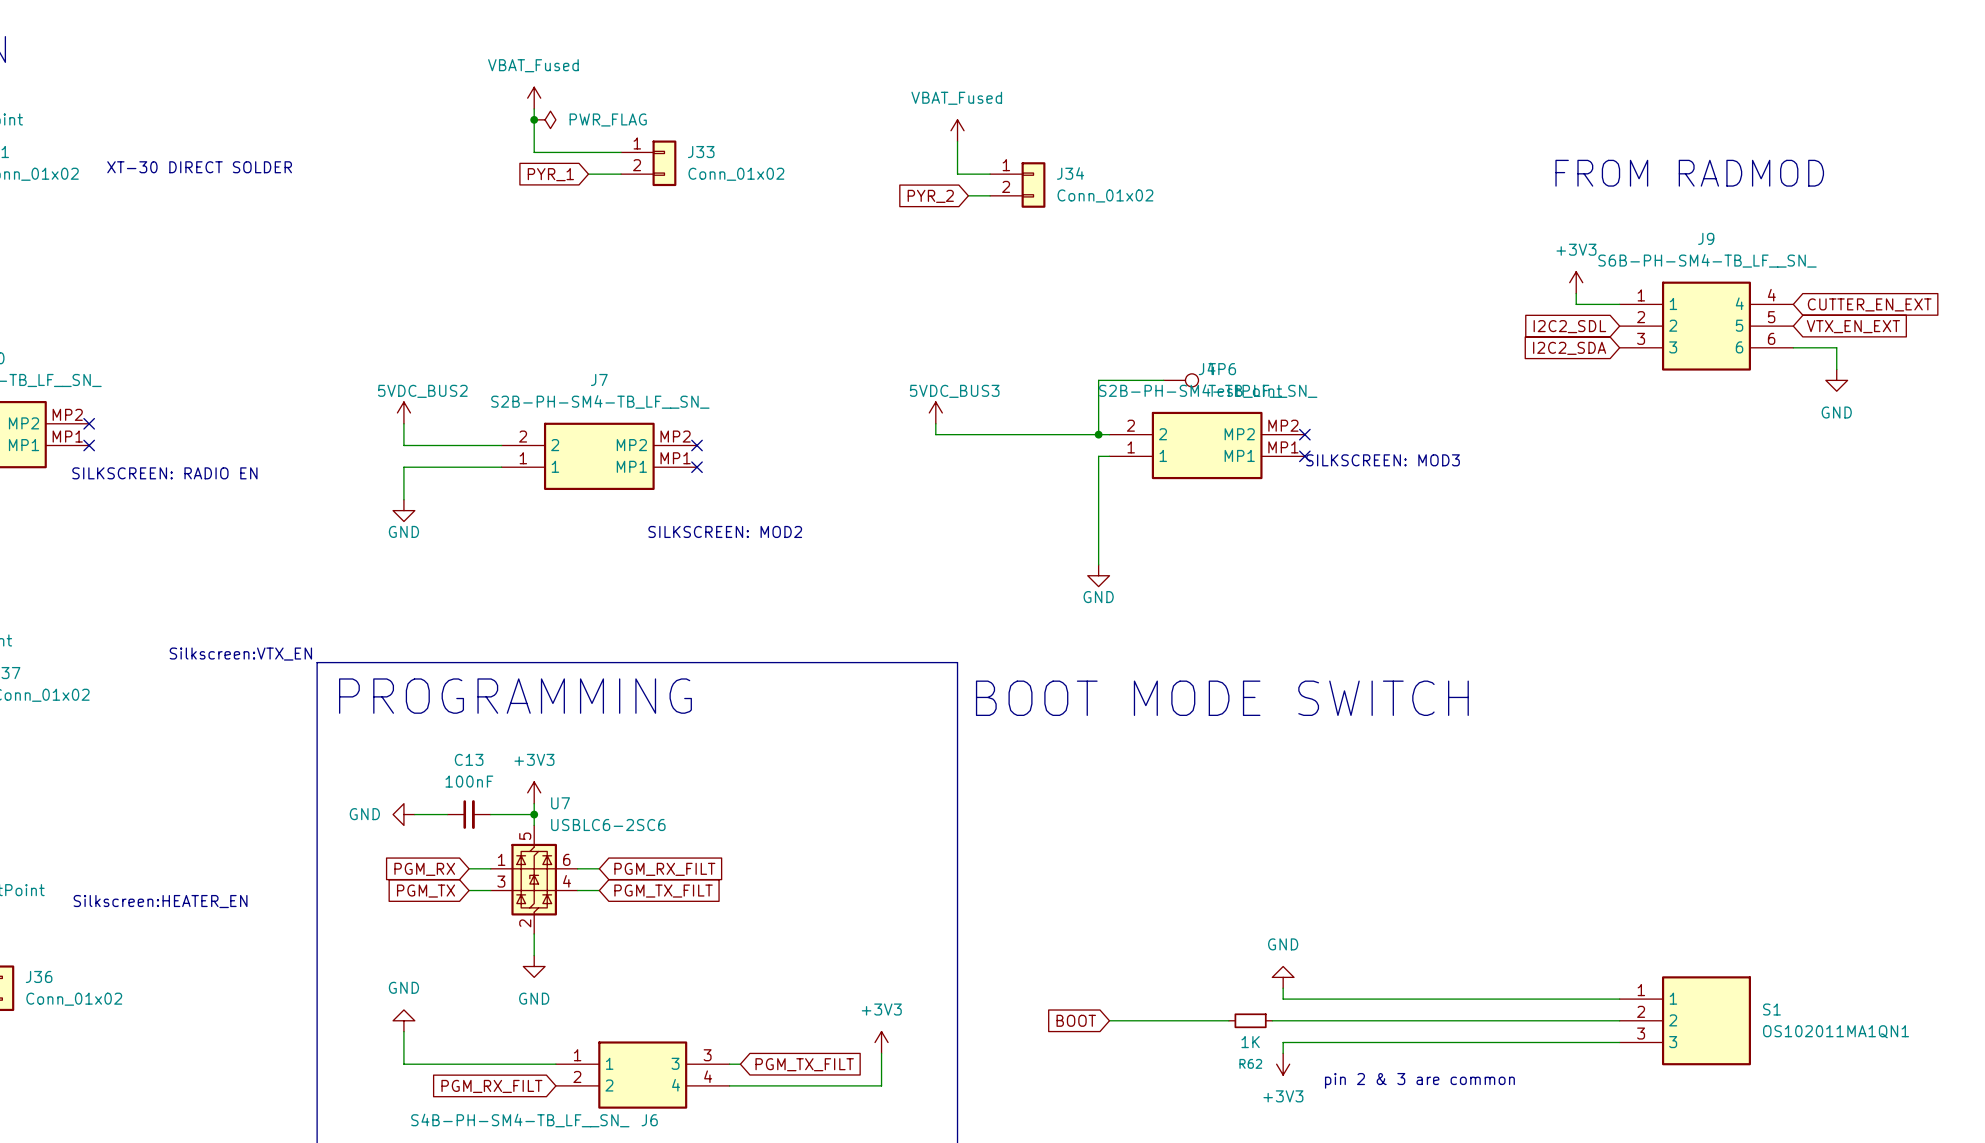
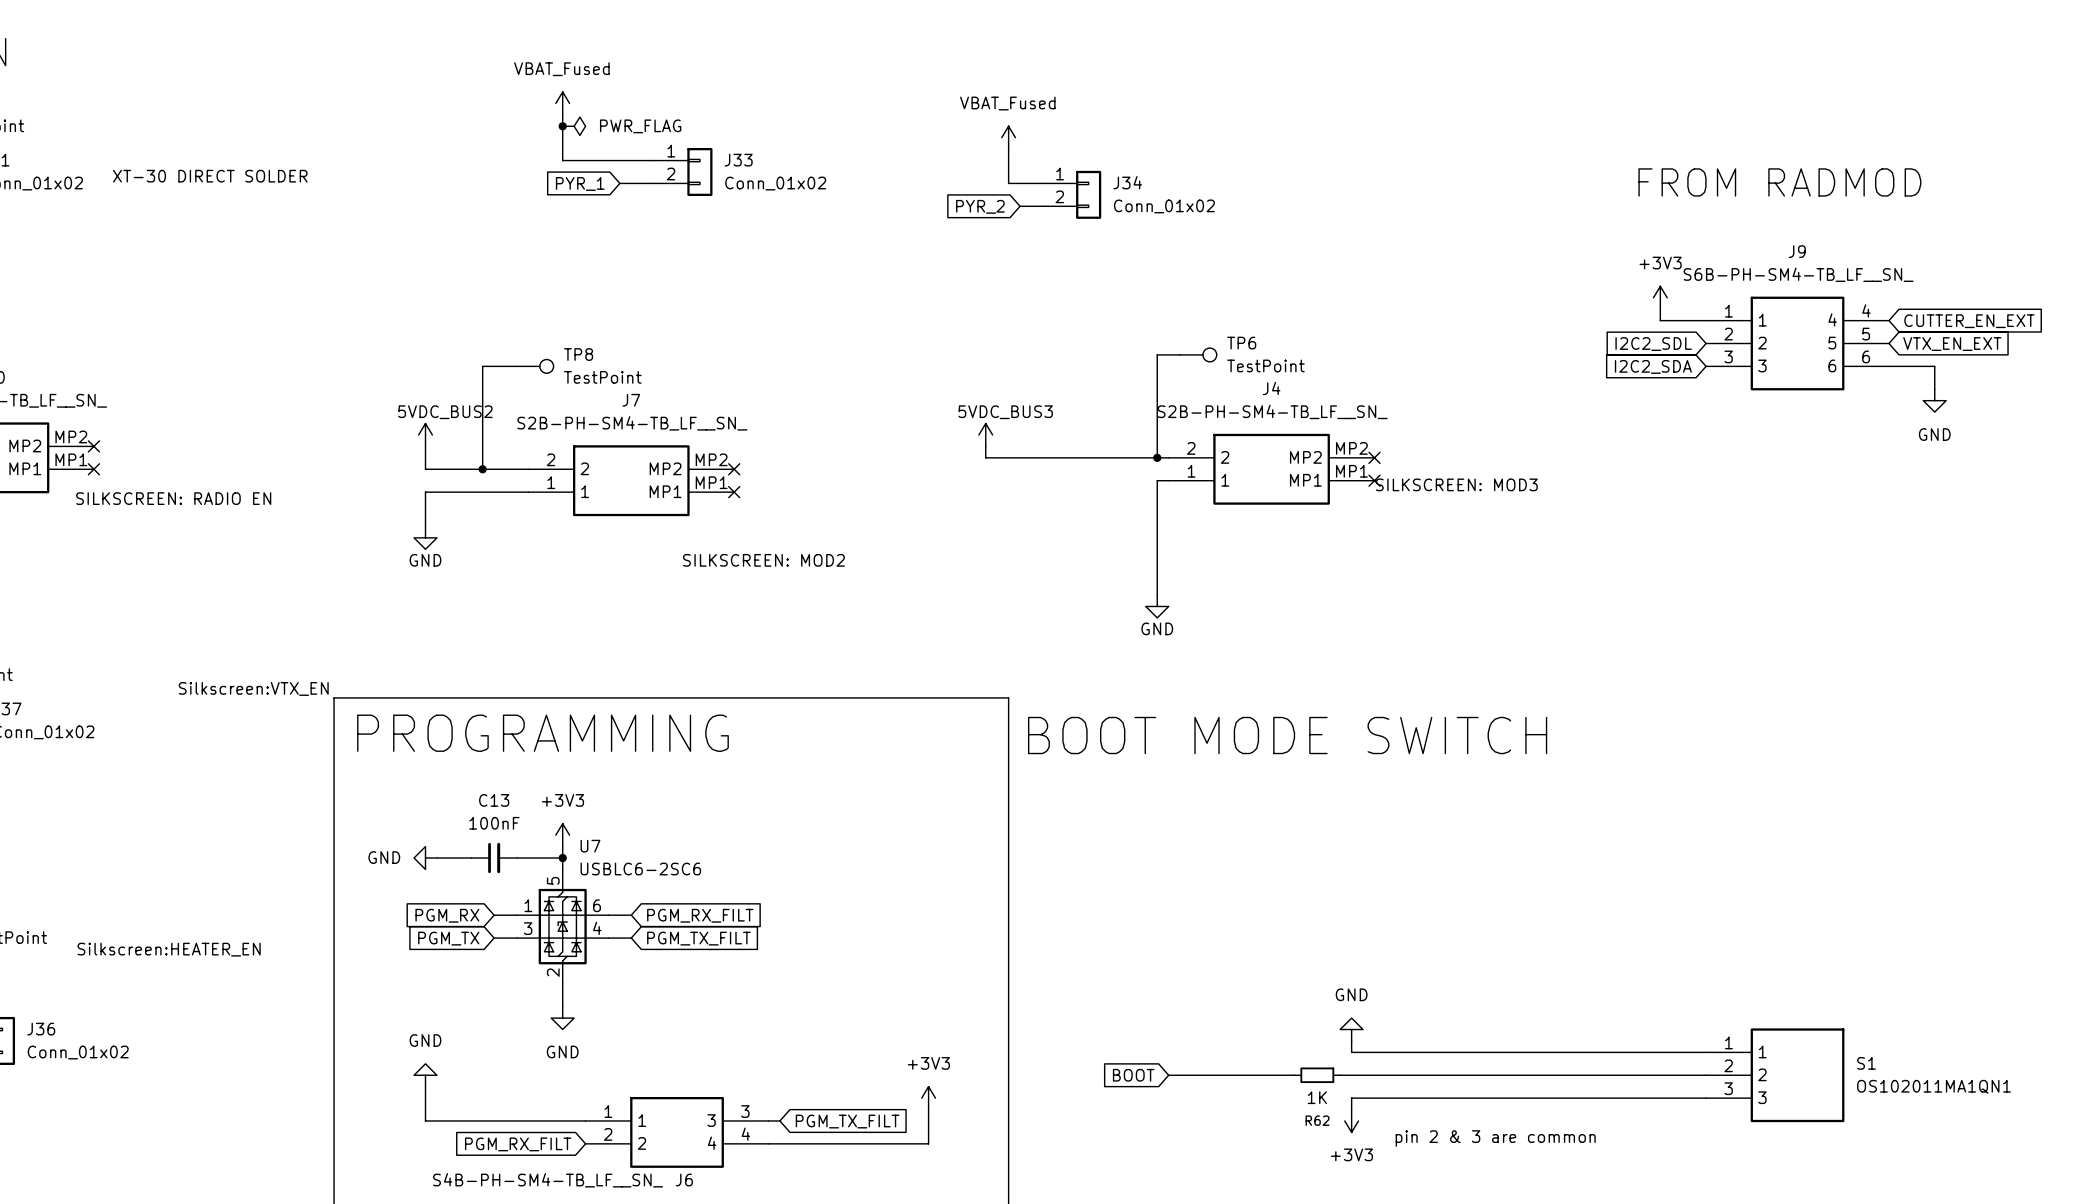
wire: none -> (516, 366) (482, 366) (482, 469)
TP8: none -> TestPoint (535, 366)
wire: (1098, 380) (1163, 380) -> (1157, 400) (1157, 354) (1180, 354)
TP6 position: (1181, 380) -> (1198, 354)
junction: none -> (482, 469)

